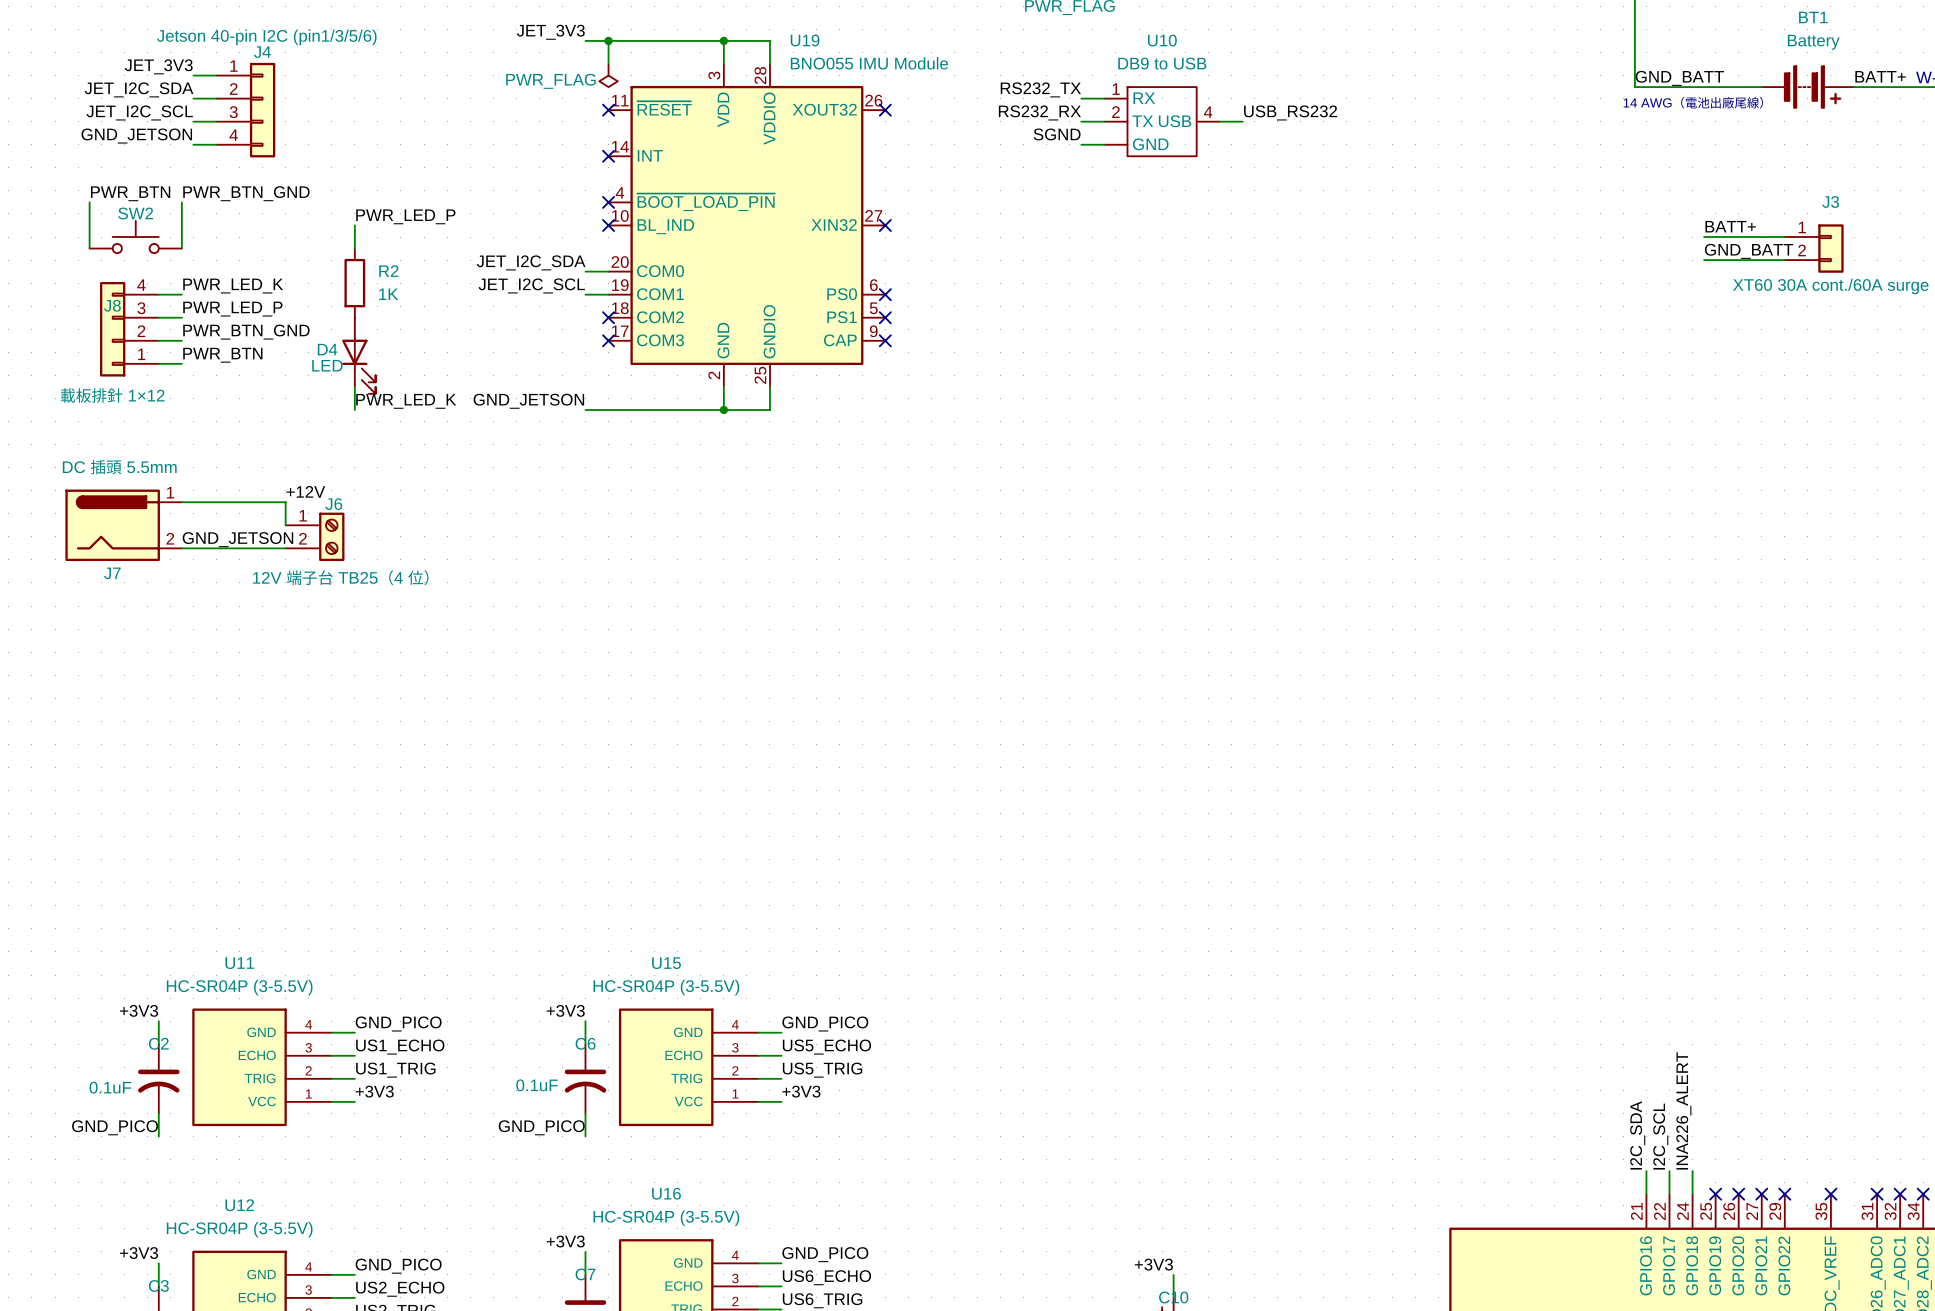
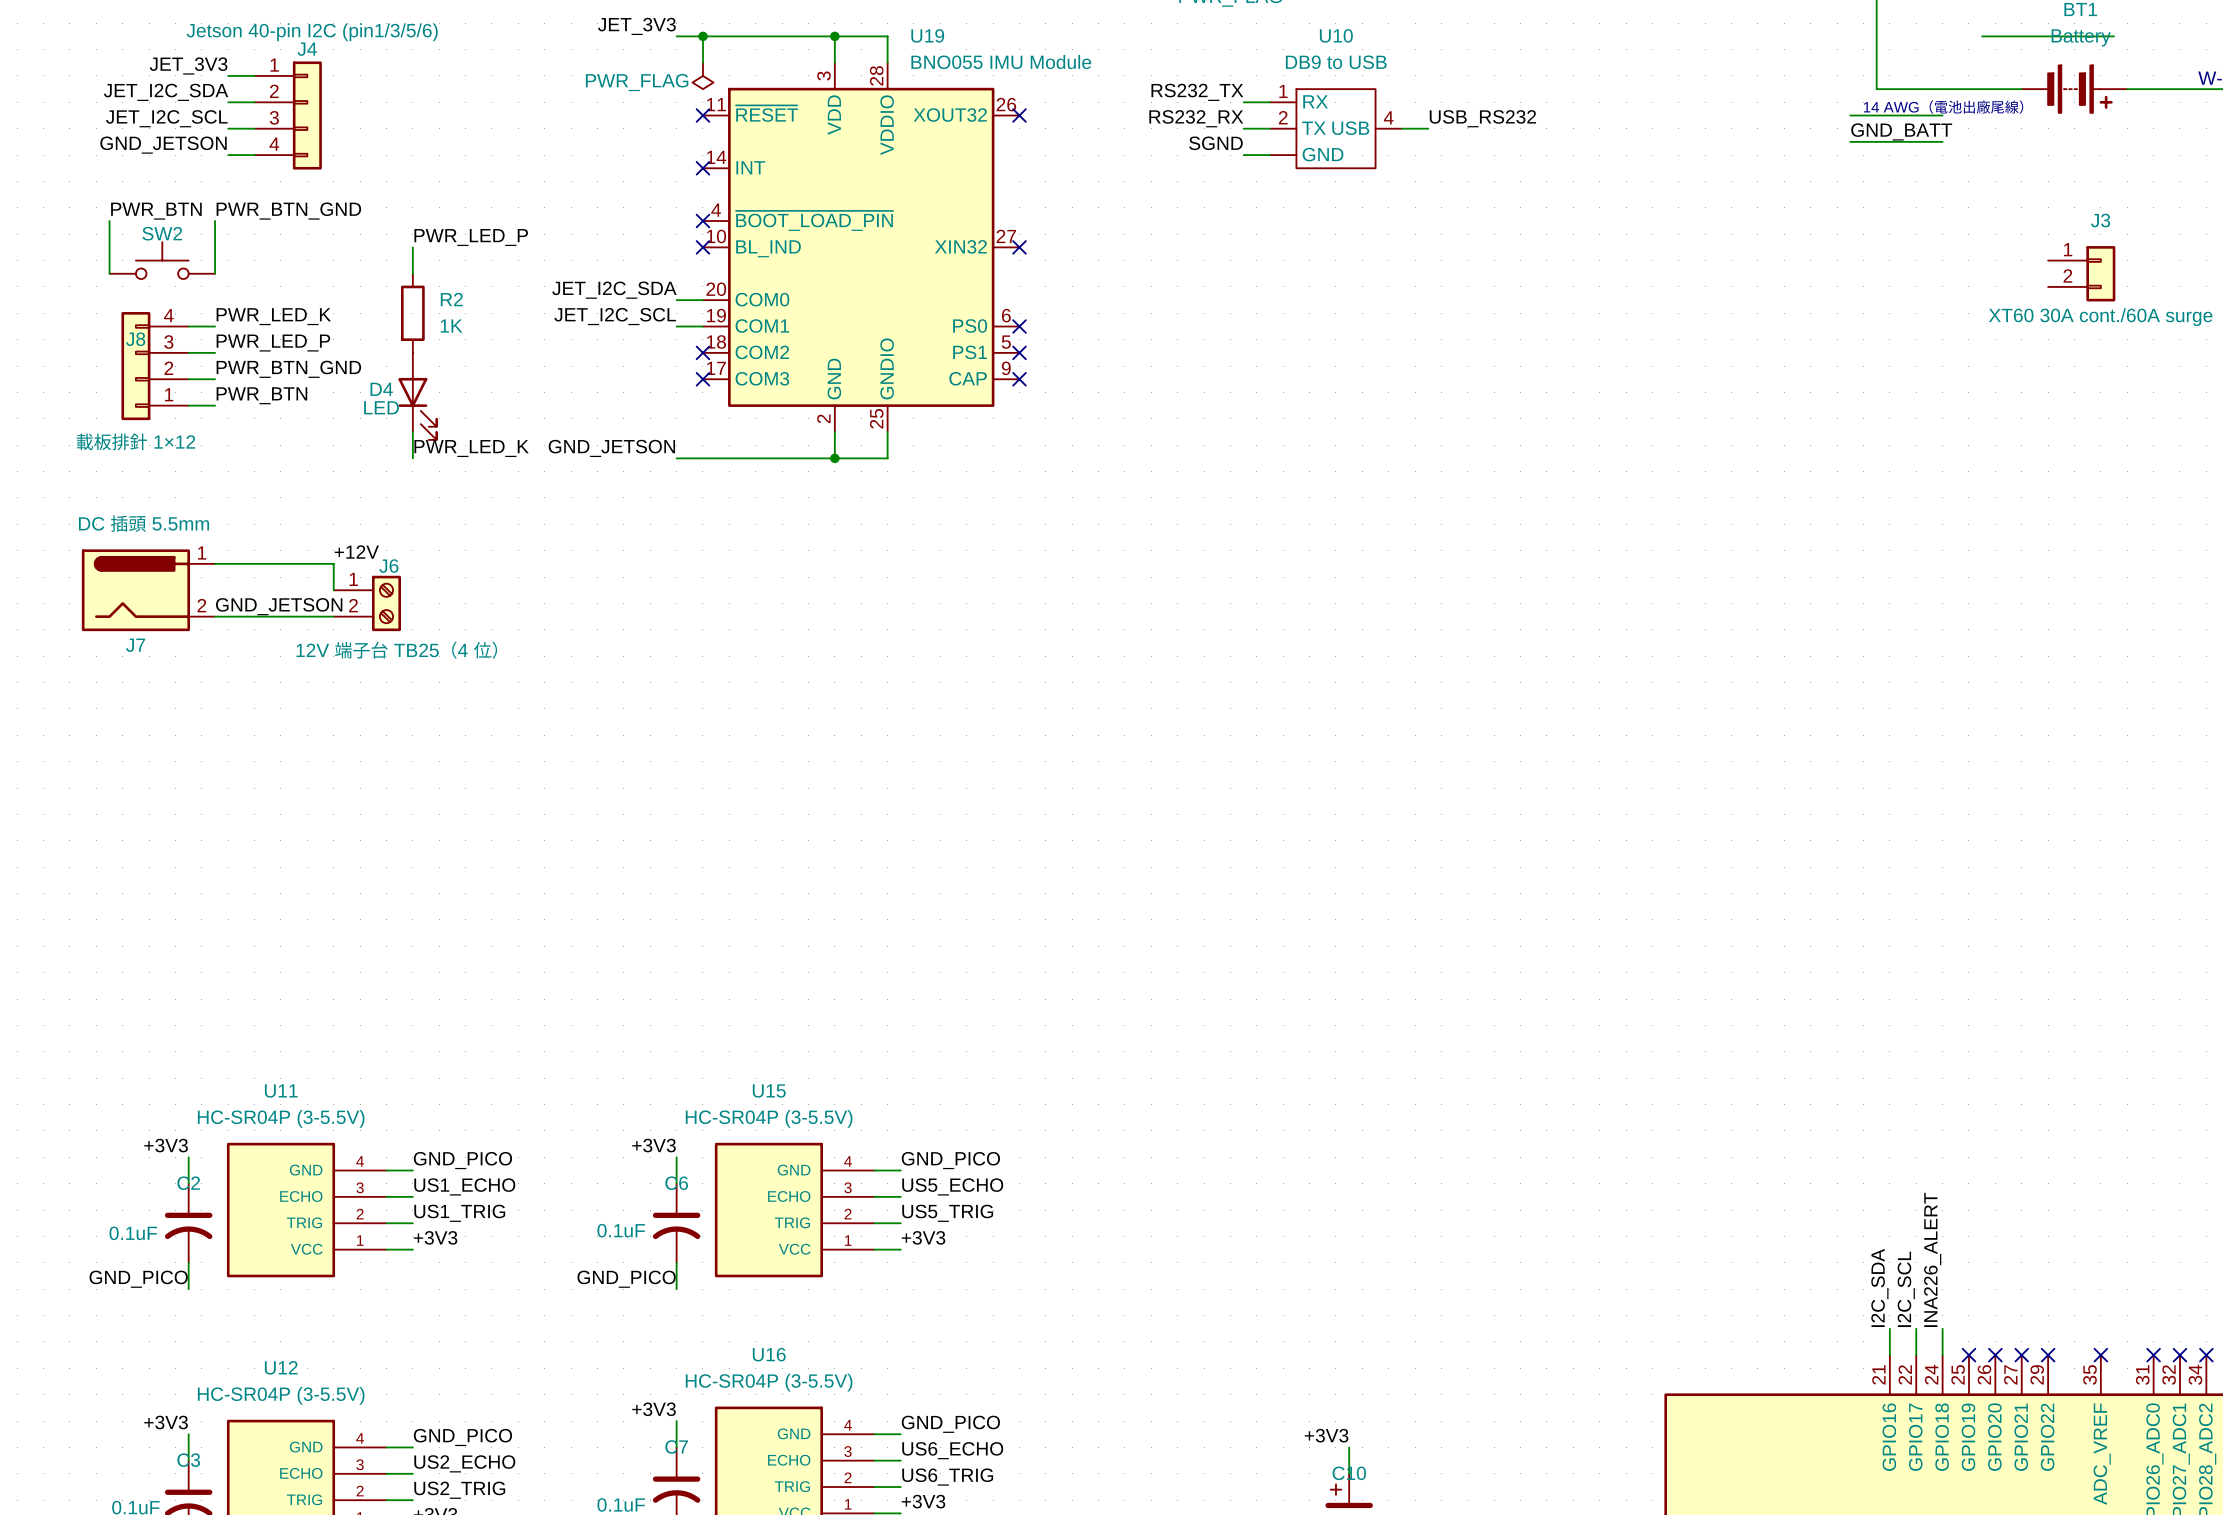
wire: none -> (1982, 36) (2114, 36)
label: BATT+ (1880, 76) -> none
label position: GND_BATT (1679, 78) -> GND_BATT (1901, 131)
label: BATT+ (1730, 226) -> none
wire: (1704, 237) (1784, 237) -> (1850, 115) (1942, 115)
label: GND_BATT (1749, 251) -> none
wire: (1704, 260) (1784, 260) -> (1850, 141) (1942, 141)

